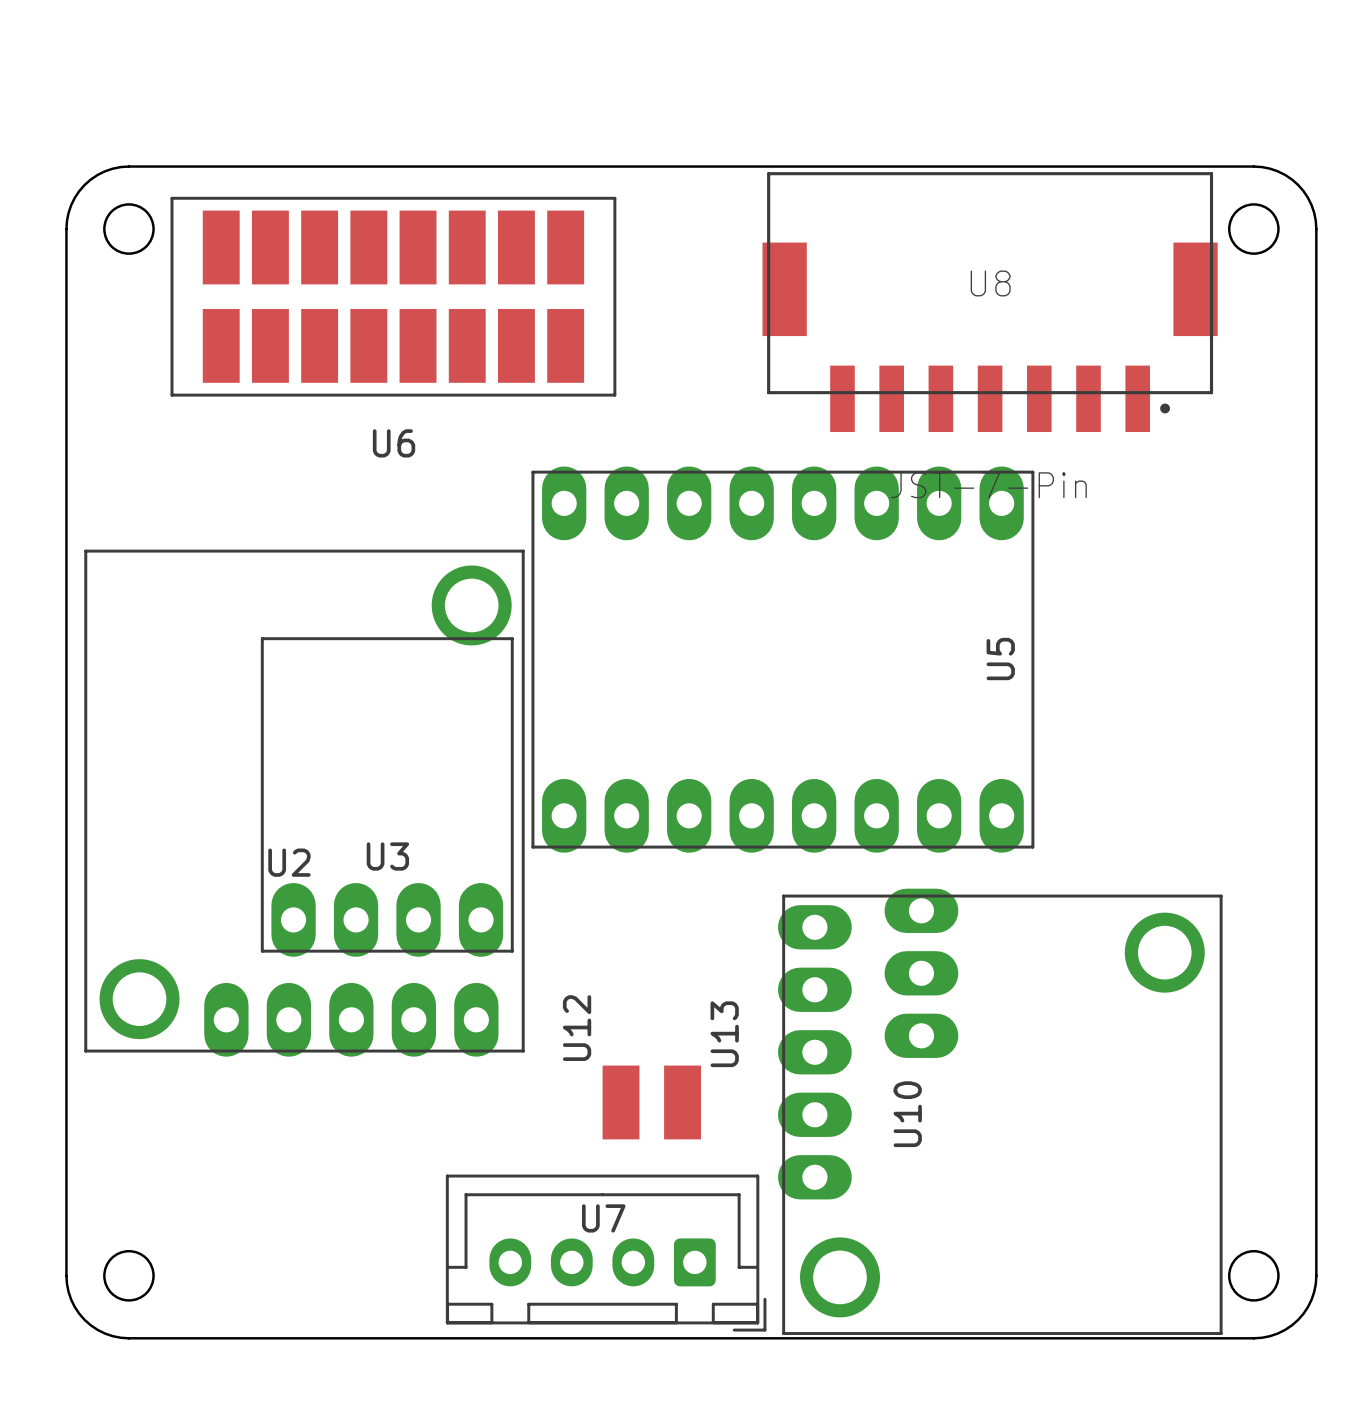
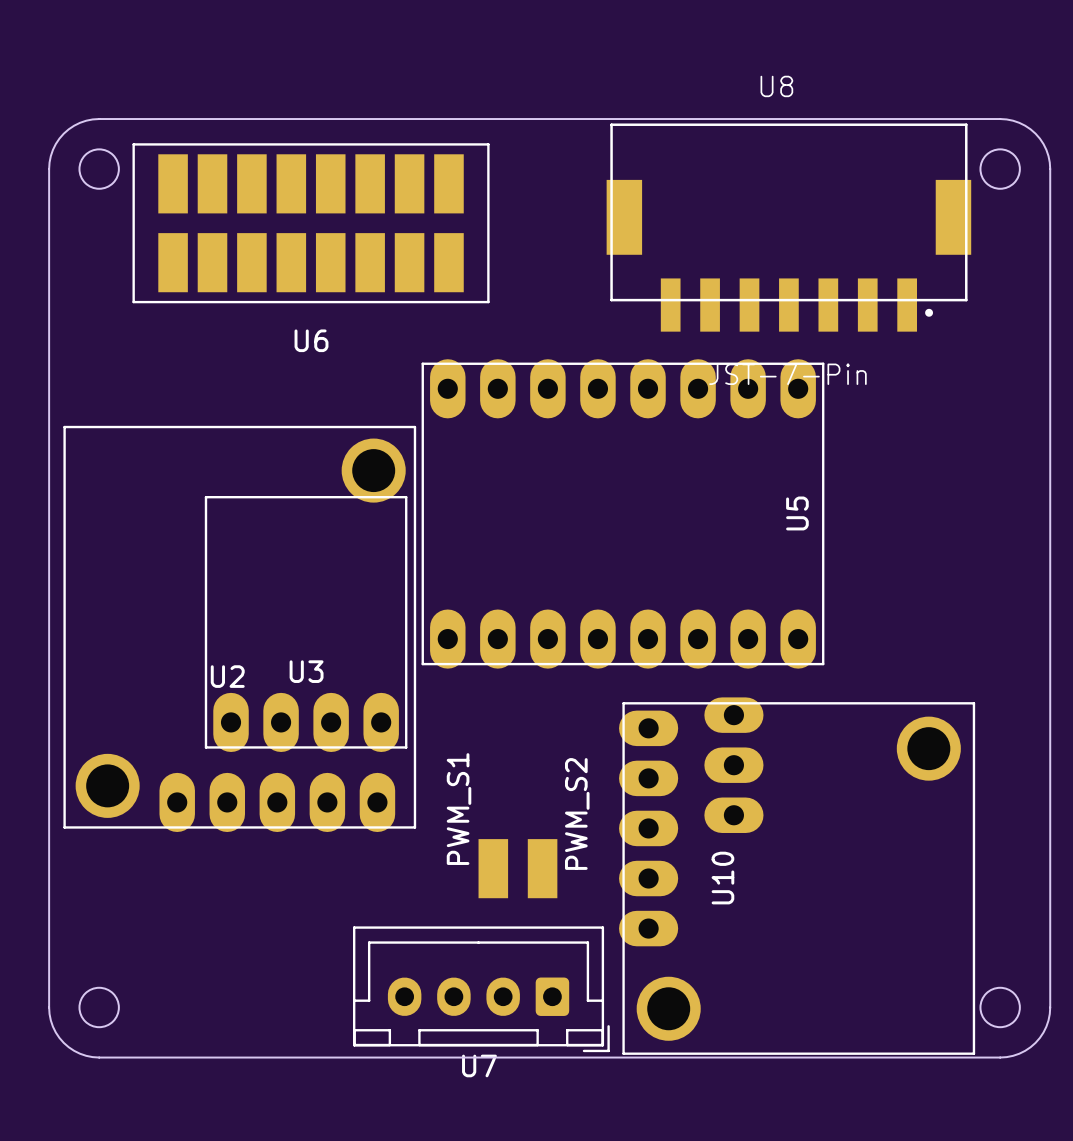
U8 name position: U8 (990, 283) -> U8 (776, 86)
U12 name: U12 (577, 1028) -> PWM_S1 (459, 809)
U13 name: U13 (724, 1034) -> PWM_S2 (577, 813)
U7 name position: U7 (603, 1218) -> U7 (479, 1065)

